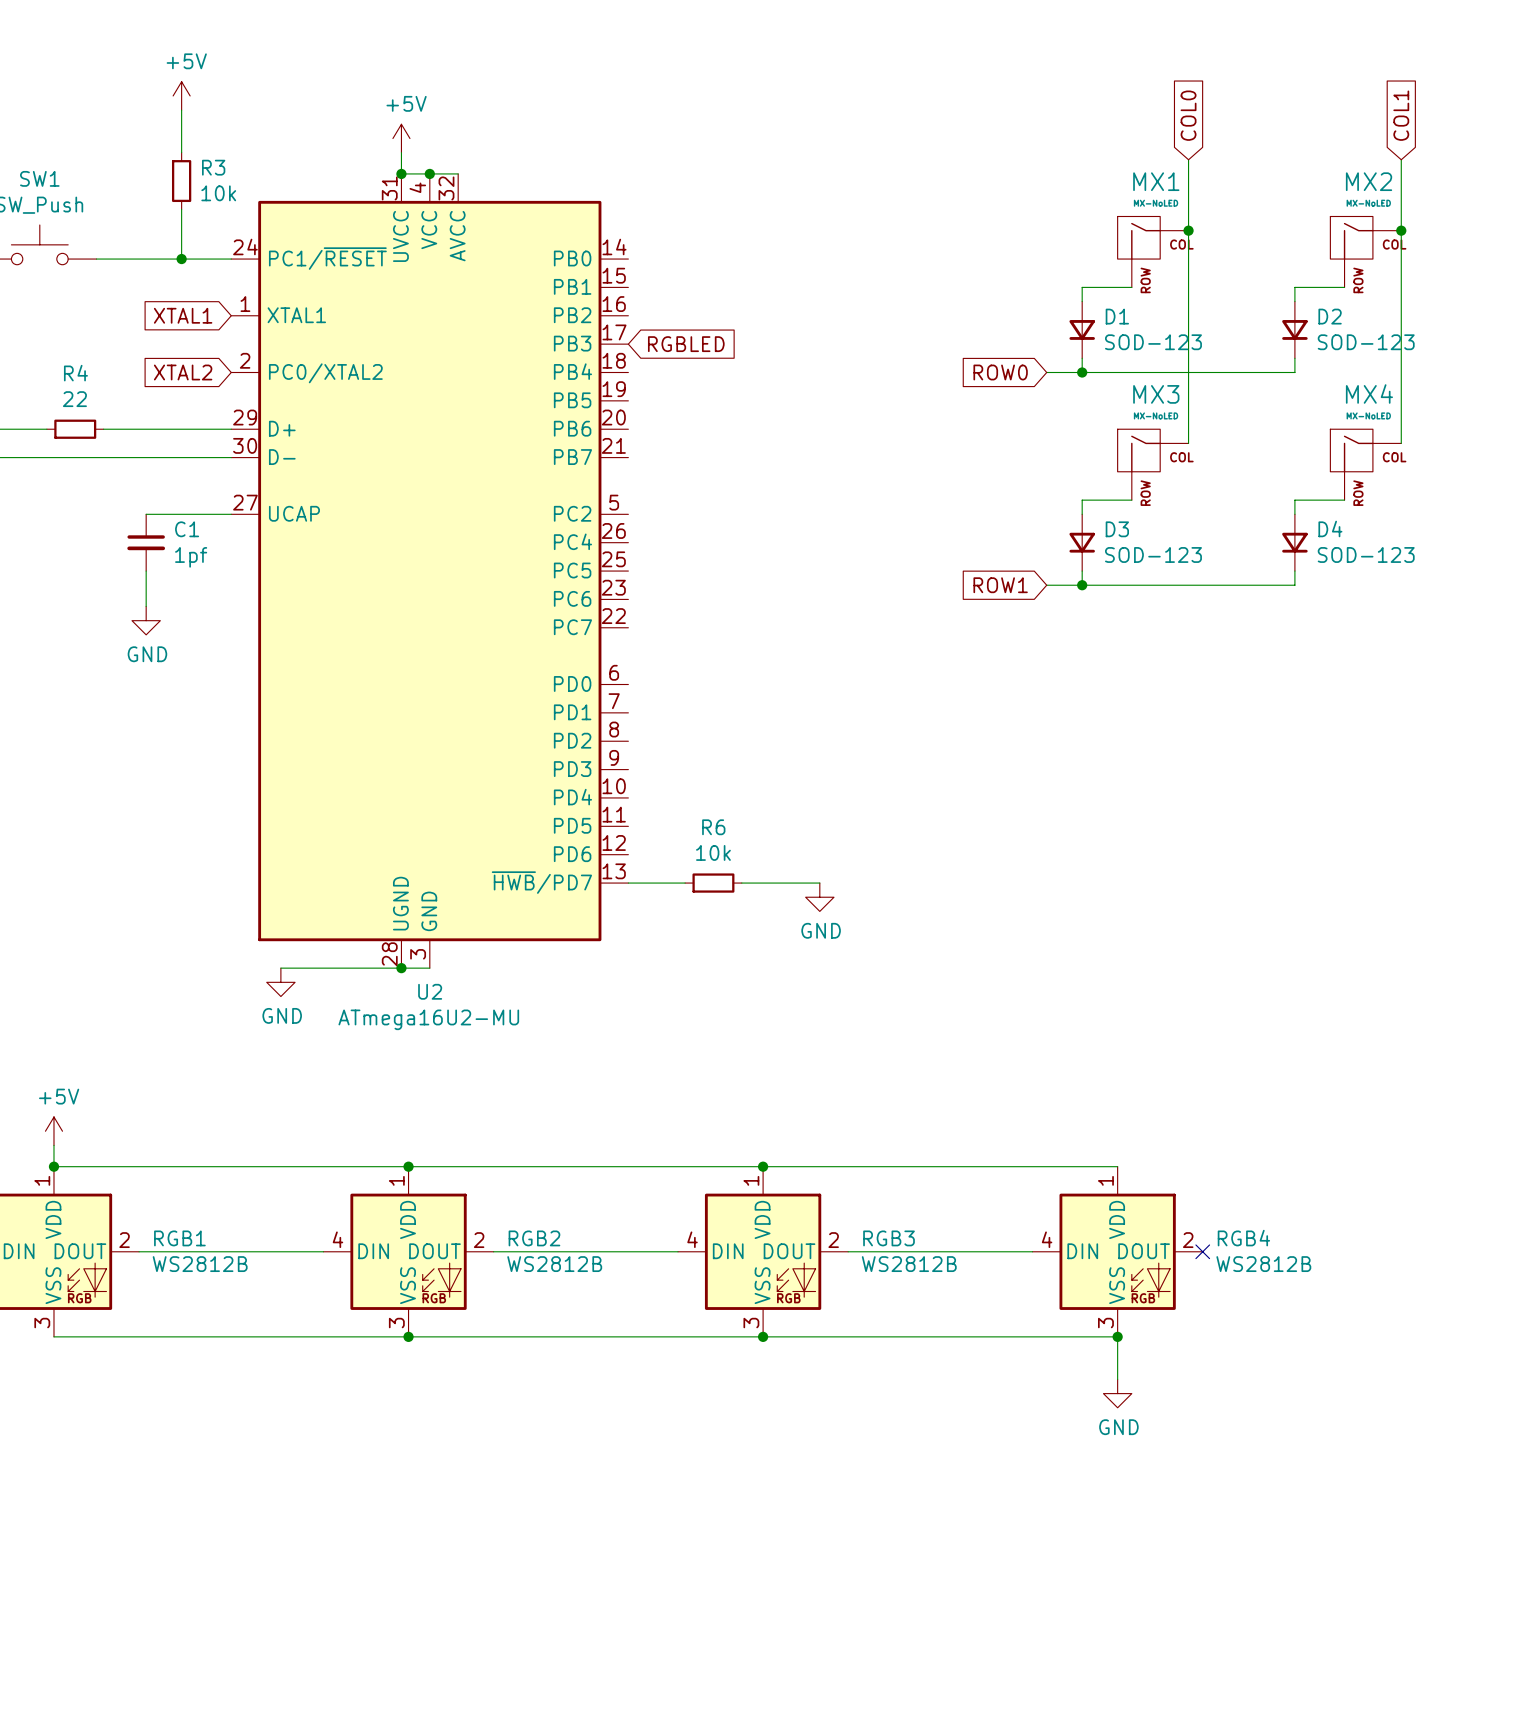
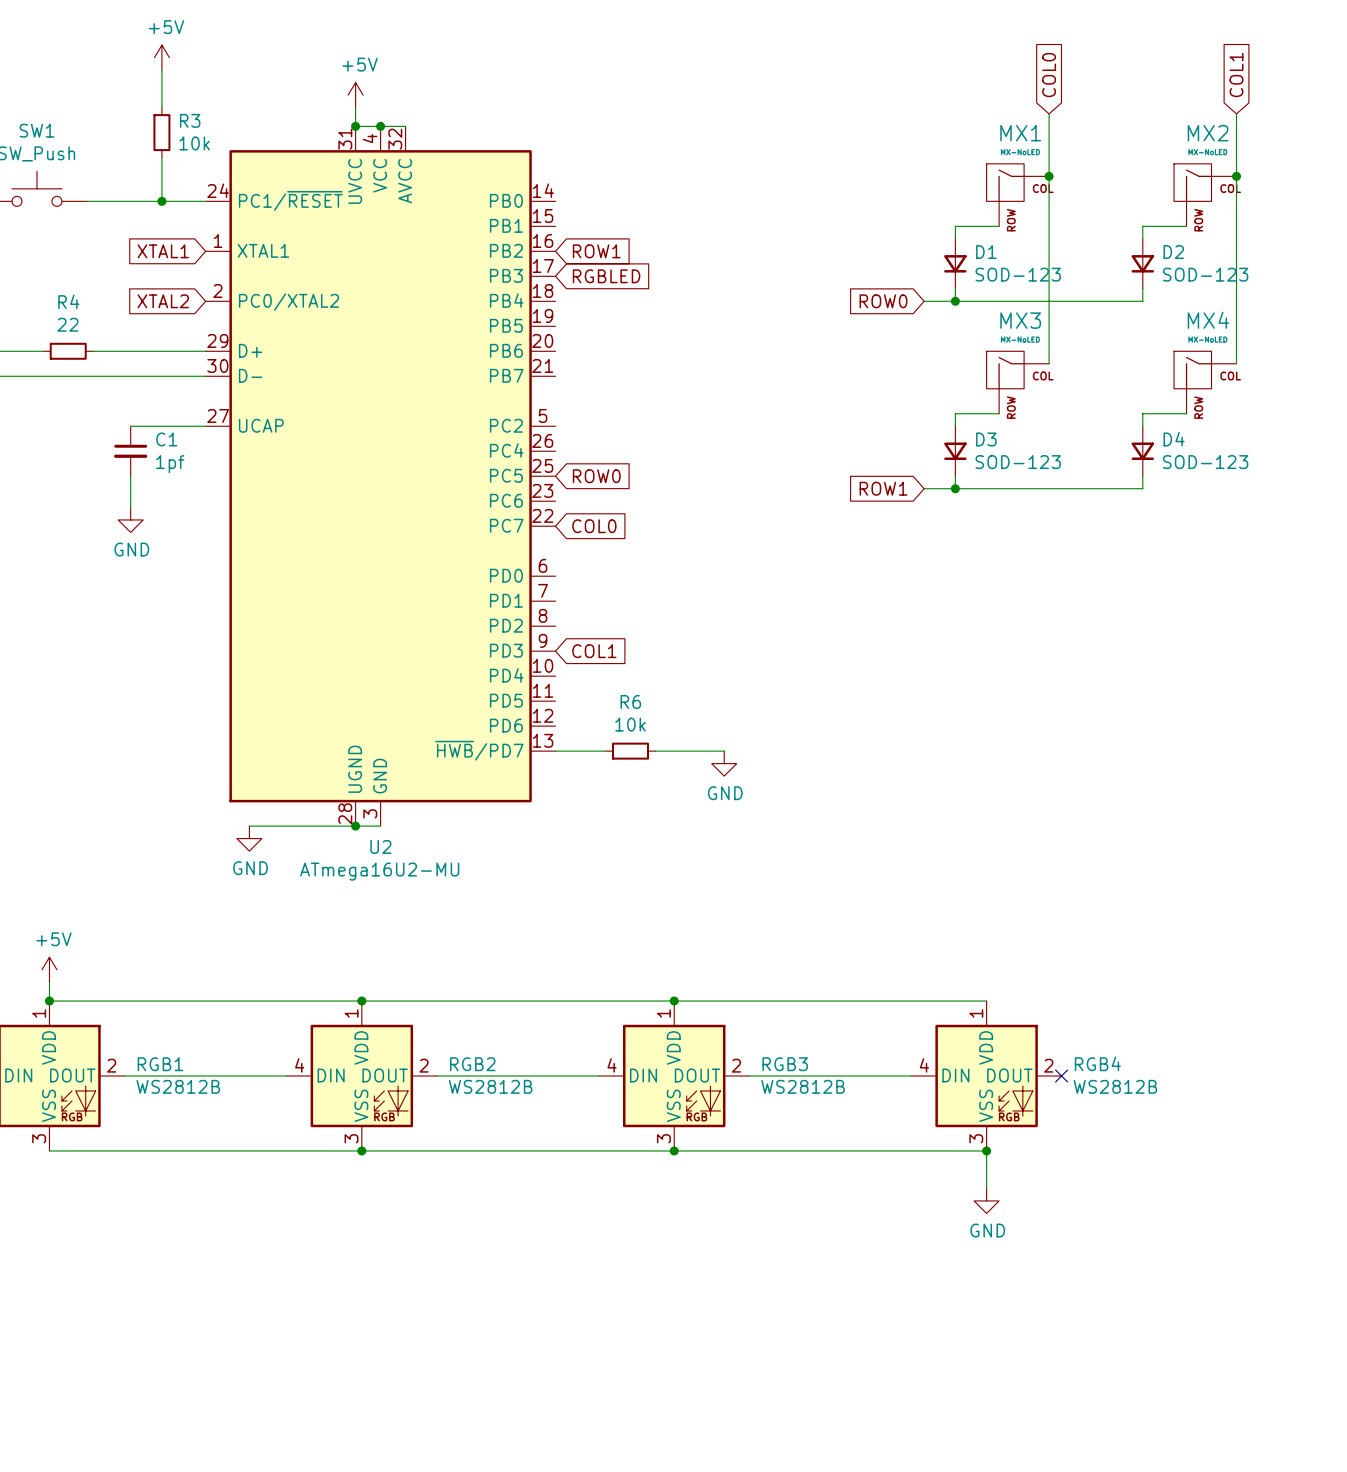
global label: none -> ROW1 (596, 251)
global label: none -> ROW0 (596, 476)
global label: none -> COL0 (594, 526)
global label: none -> COL1 (594, 651)

